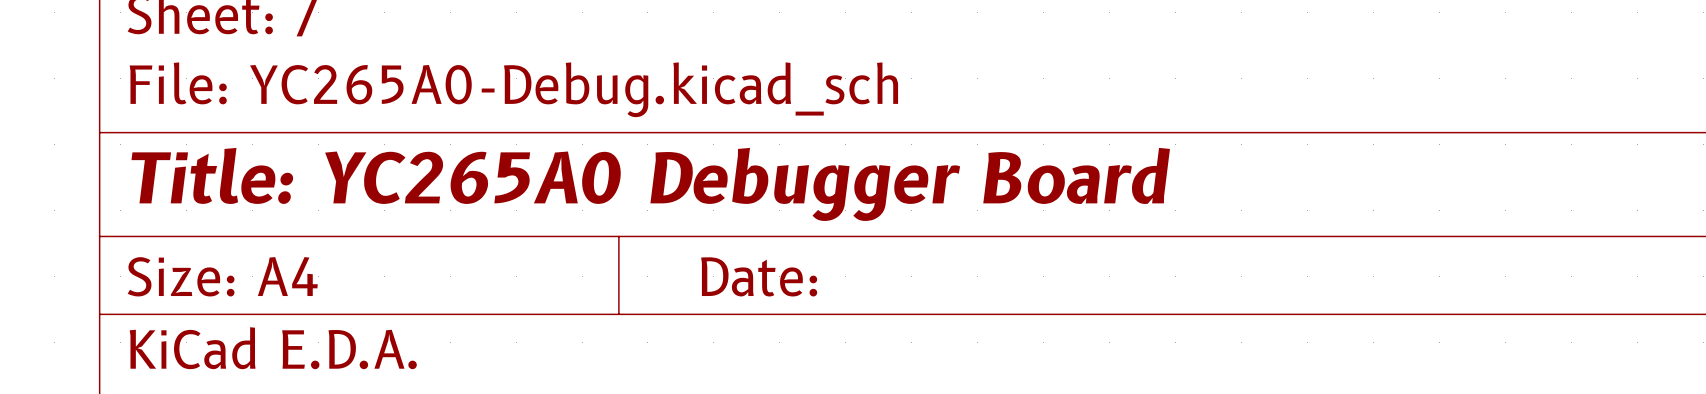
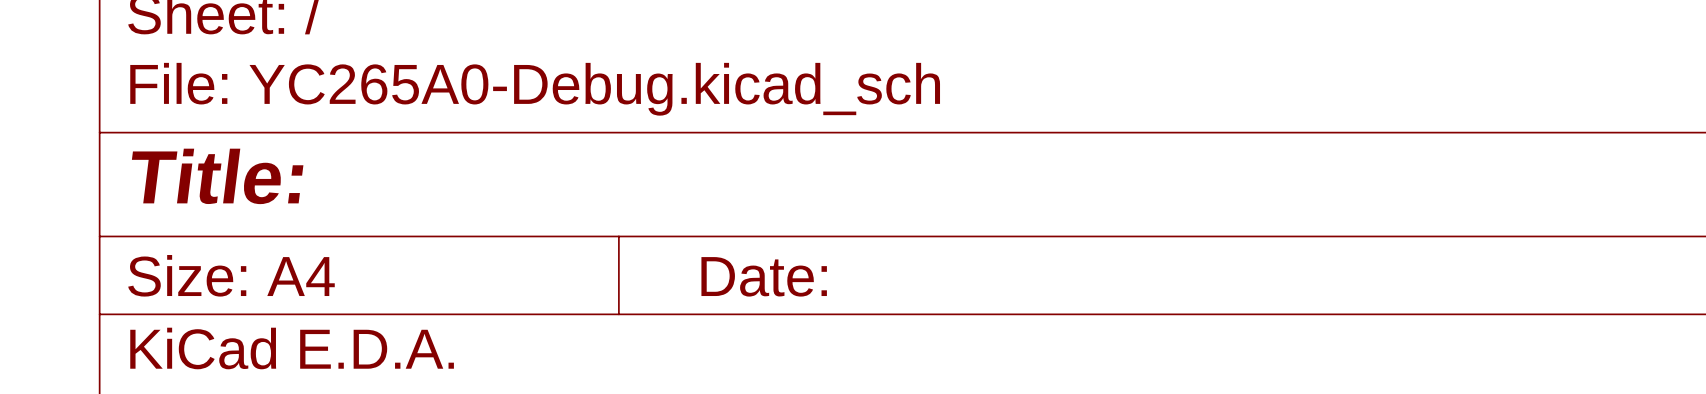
title block: Title: YC265A0 Debugger Board (650, 184) -> Title: (217, 176)

